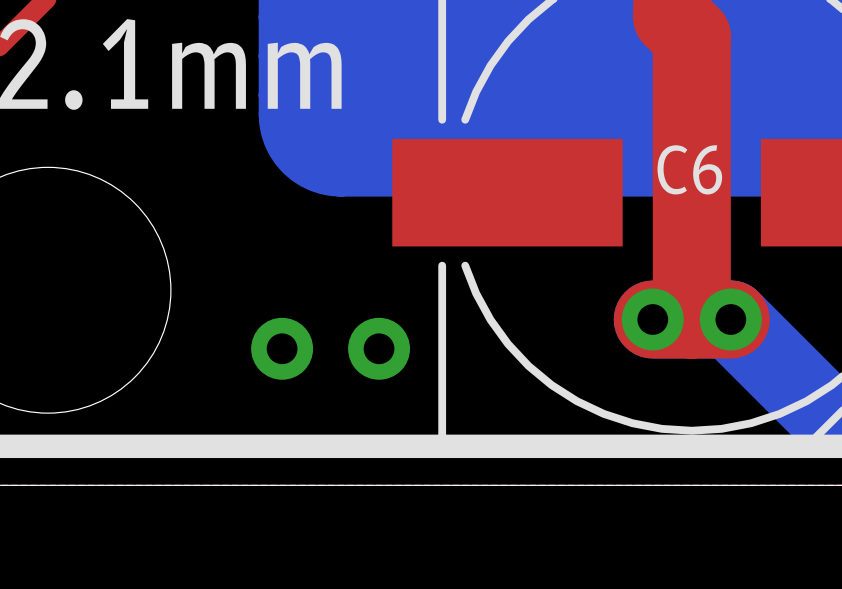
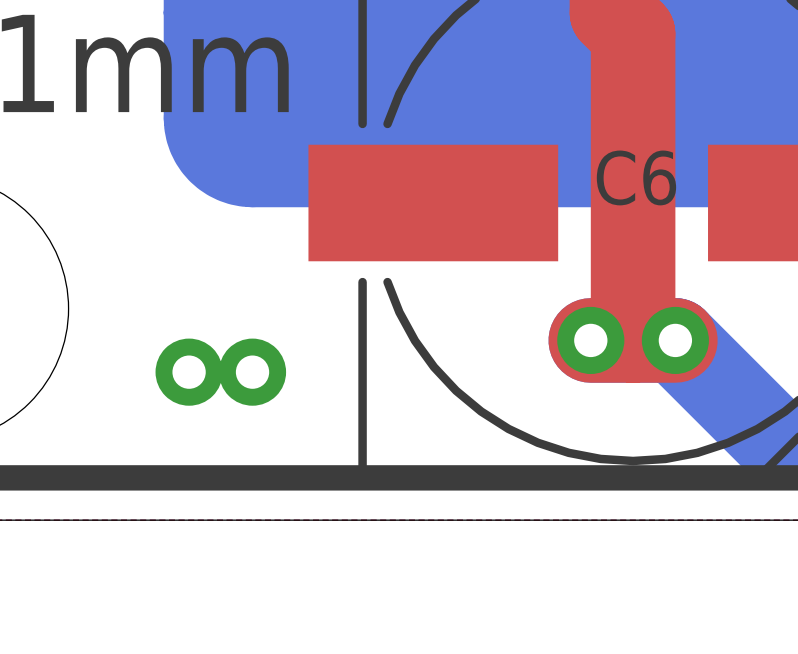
via position: (379, 348) -> (252, 372)

